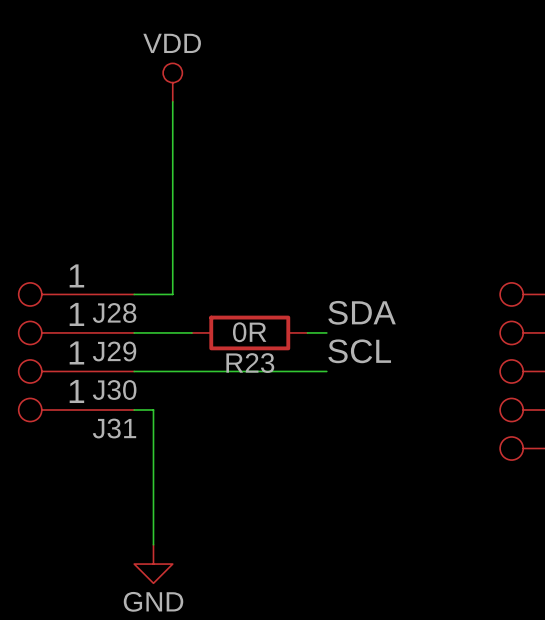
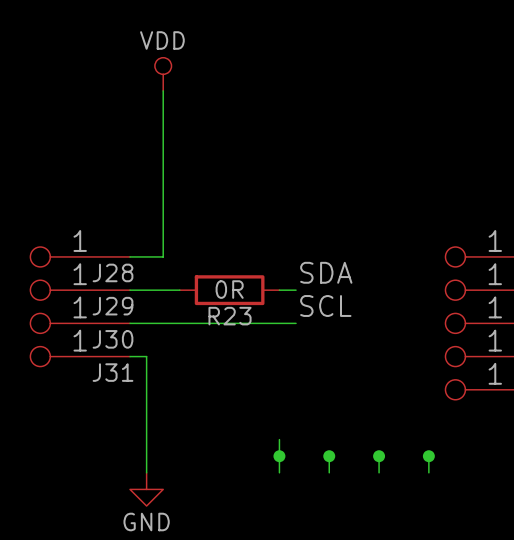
wire: none -> (279, 439) (279, 472)
junction: none -> (279, 456)
wire: none -> (329, 456) (329, 472)
junction: none -> (329, 456)
wire: none -> (379, 456) (379, 472)
junction: none -> (379, 456)
wire: none -> (428, 456) (428, 472)
junction: none -> (428, 456)

